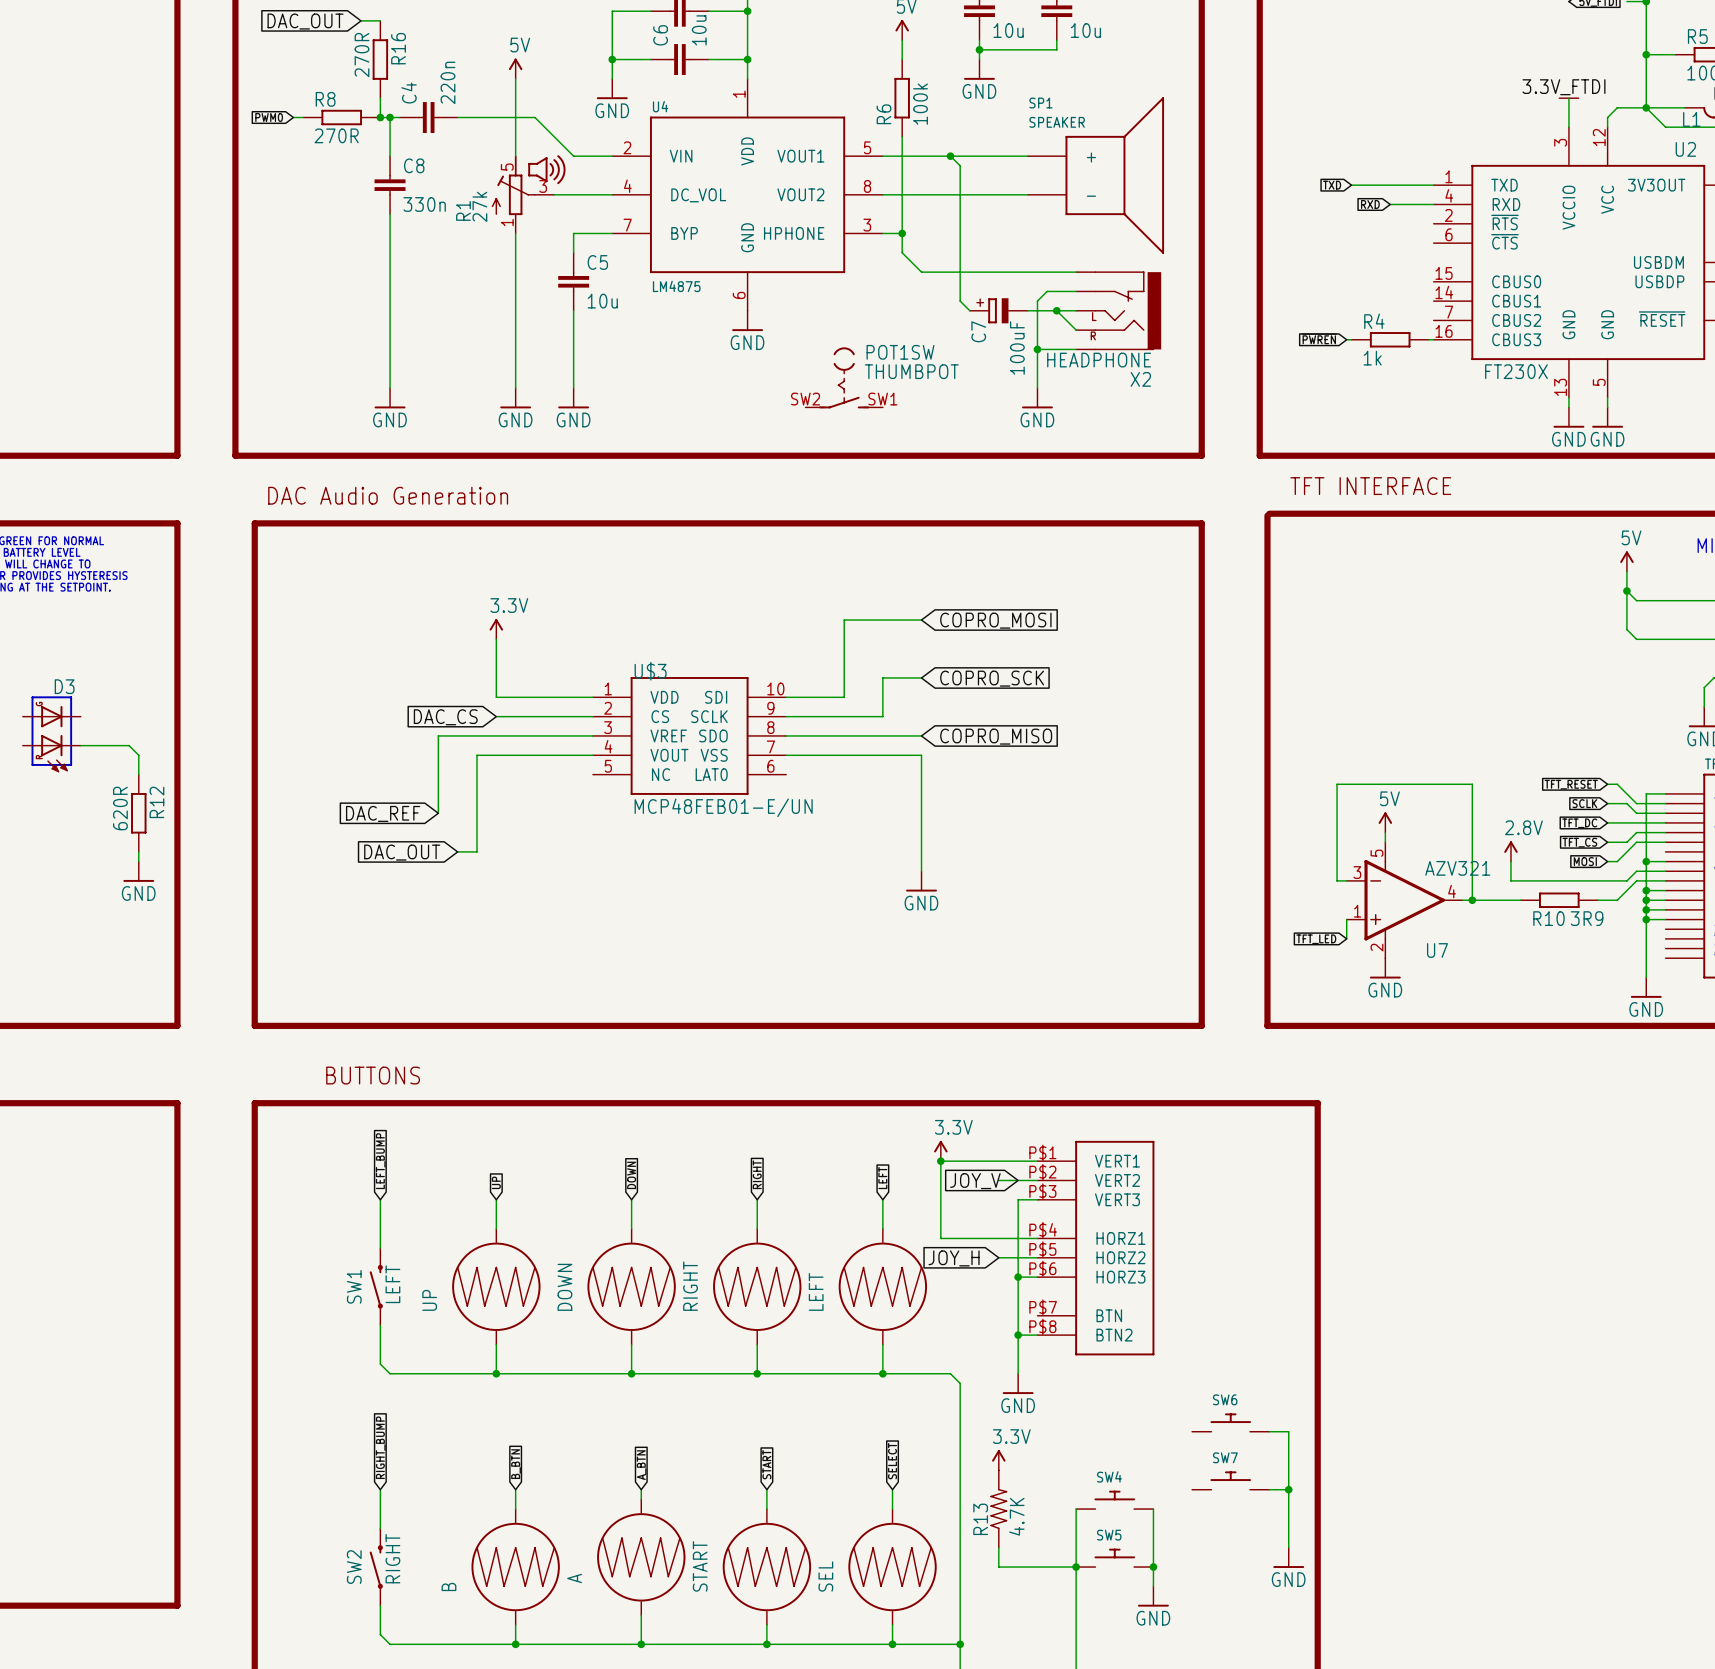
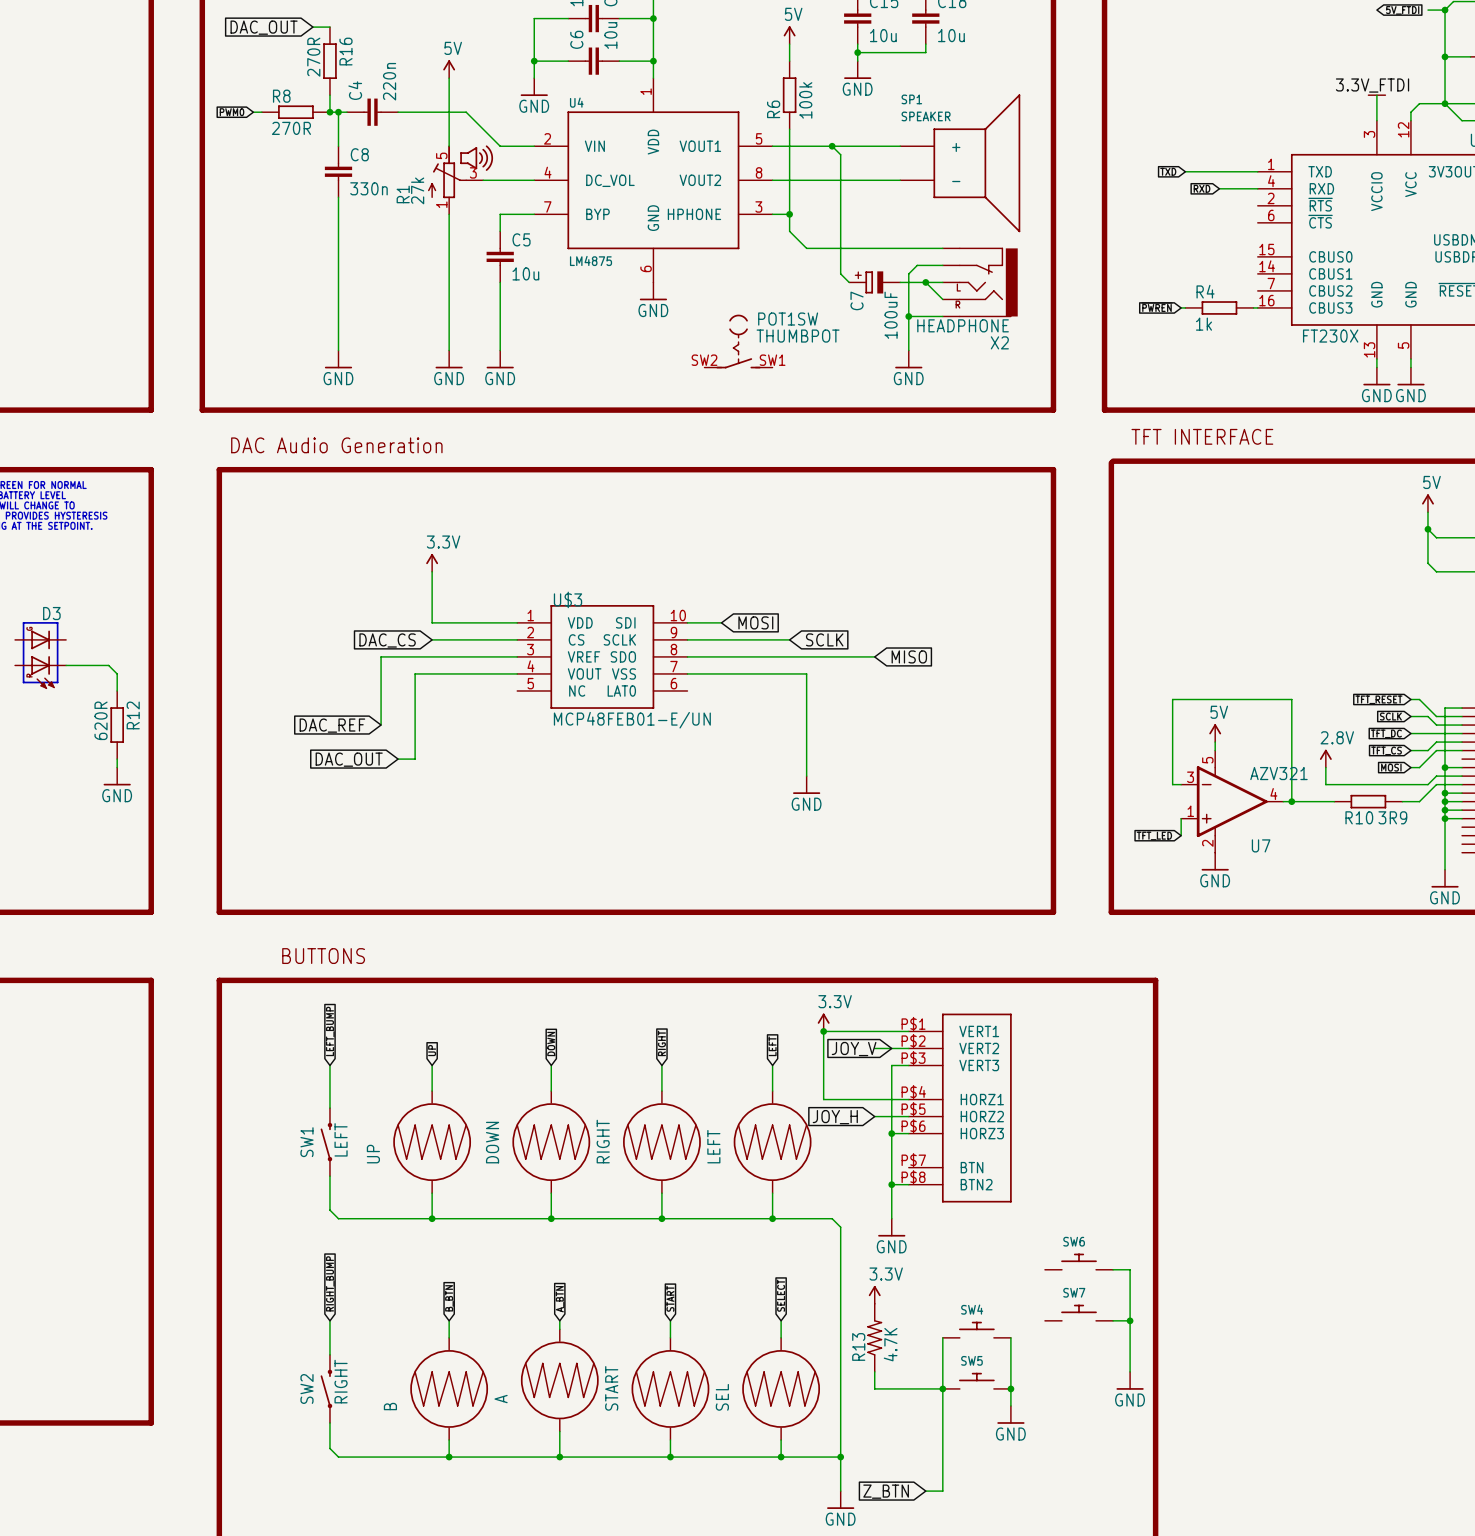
wire: (921, 620) (844, 620) (844, 697) (824, 697) -> none
global label: COPRO_MOSI (995, 620) -> none
wire: (921, 677) (882, 677) (882, 716) -> (789, 639) (772, 639)
global label: COPRO_SCK (992, 678) -> none
global label: none -> MOSI (755, 622)
global label: none -> SCLK (824, 639)
wire: none -> (806, 656) (874, 656)
global label: none -> MISO (909, 656)
global label: COPRO_MISO (996, 736) -> none

